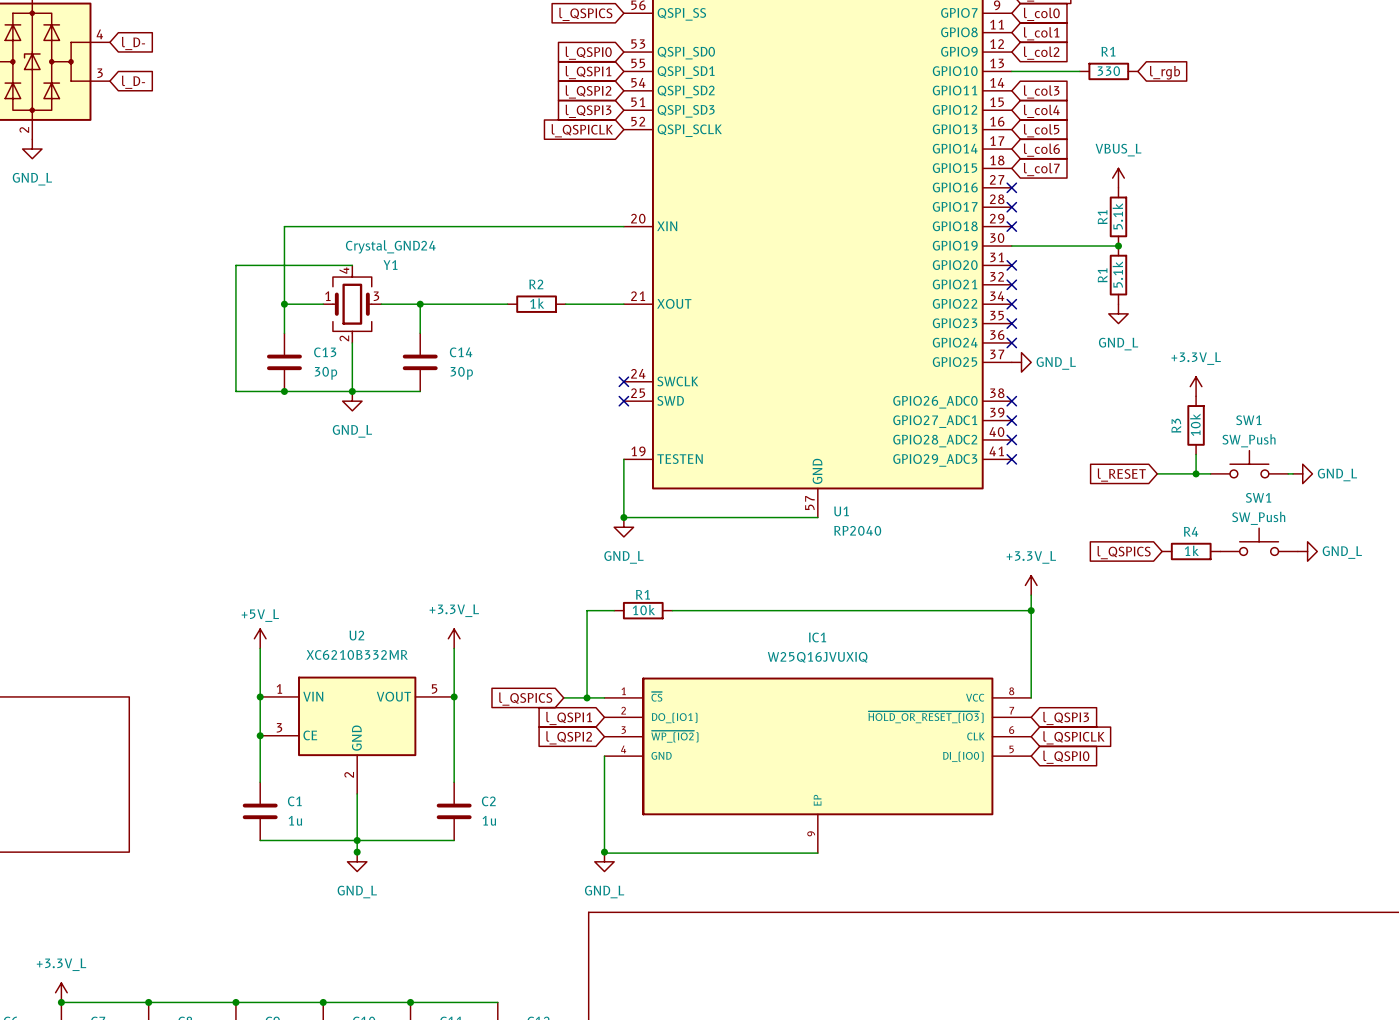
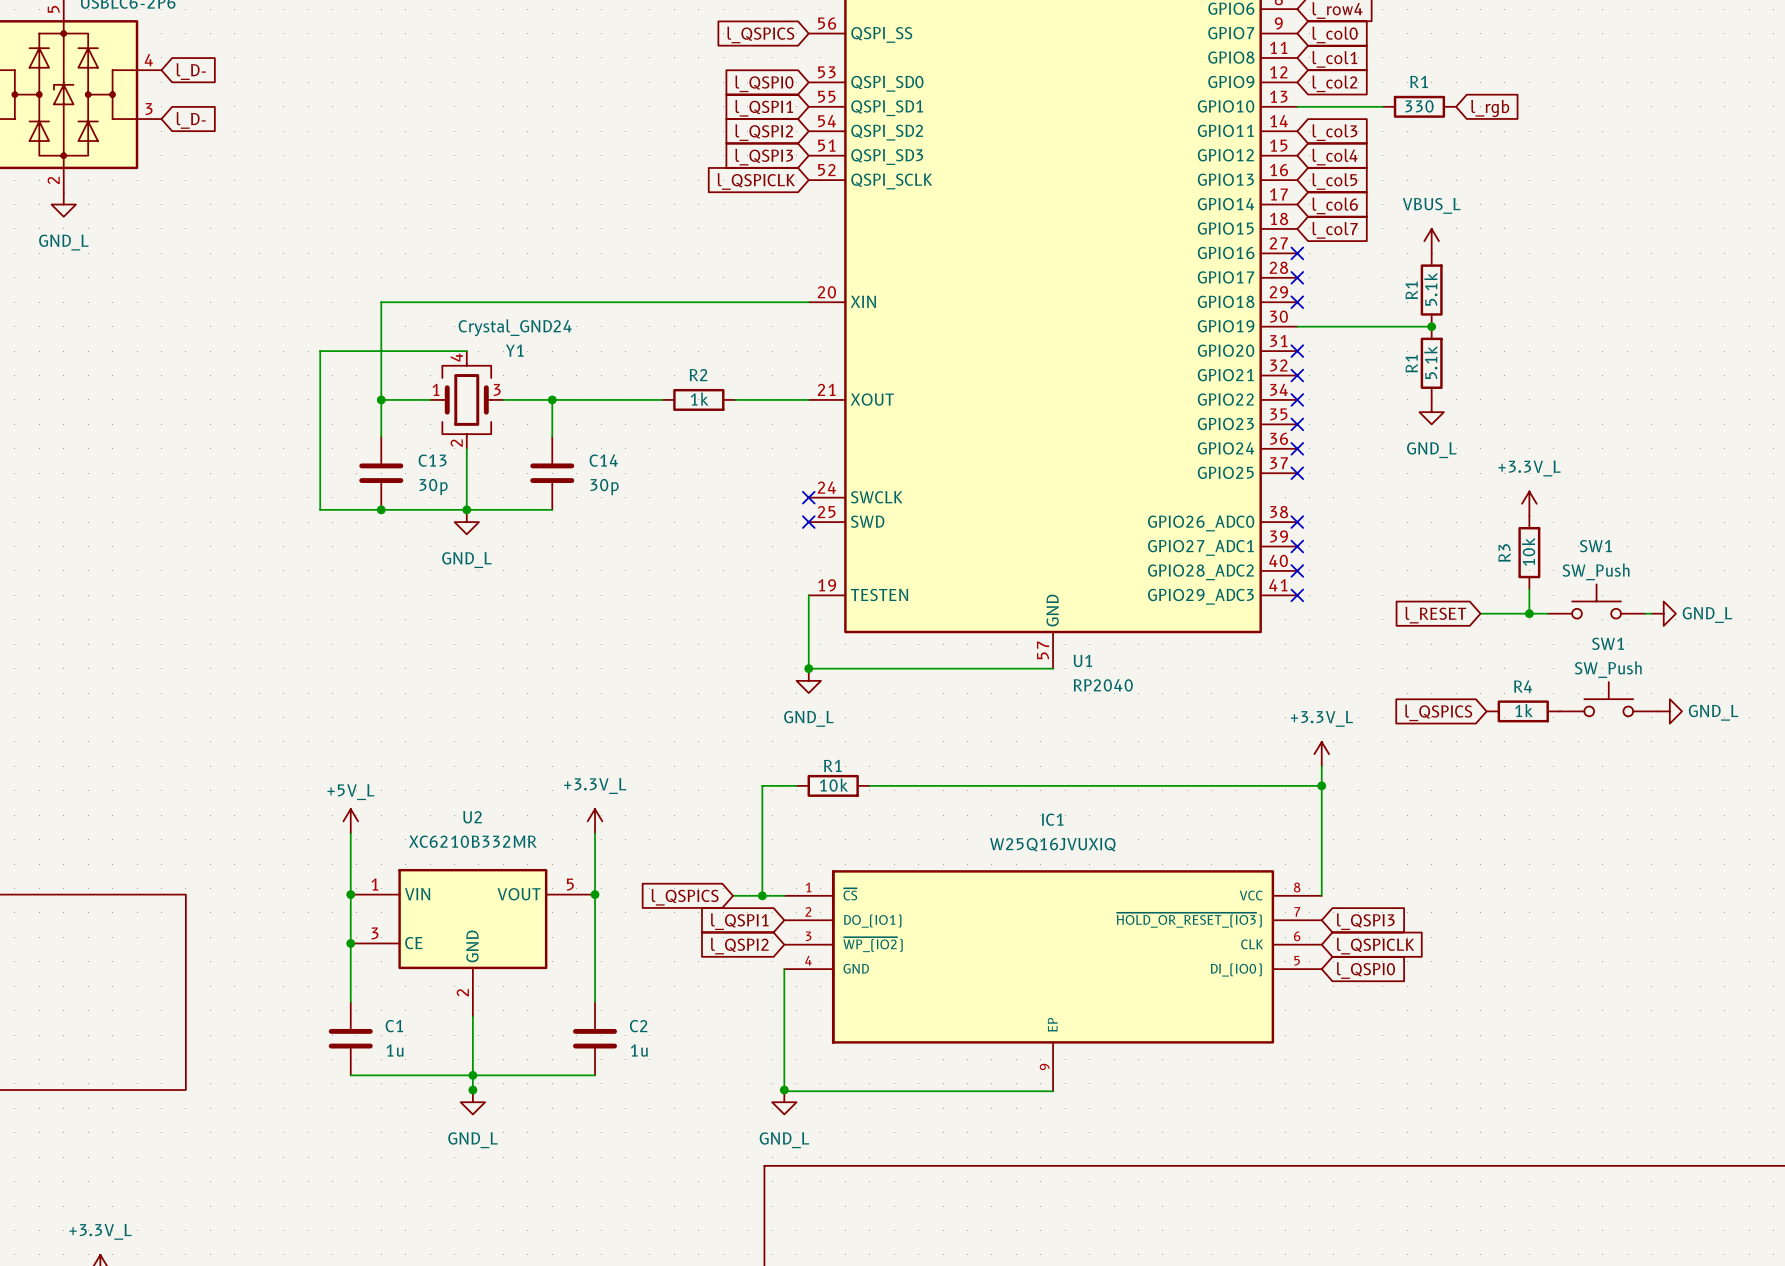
no-connect mark: none -> (1297, 473)
power symbol: GND_L (1021, 362) -> none

